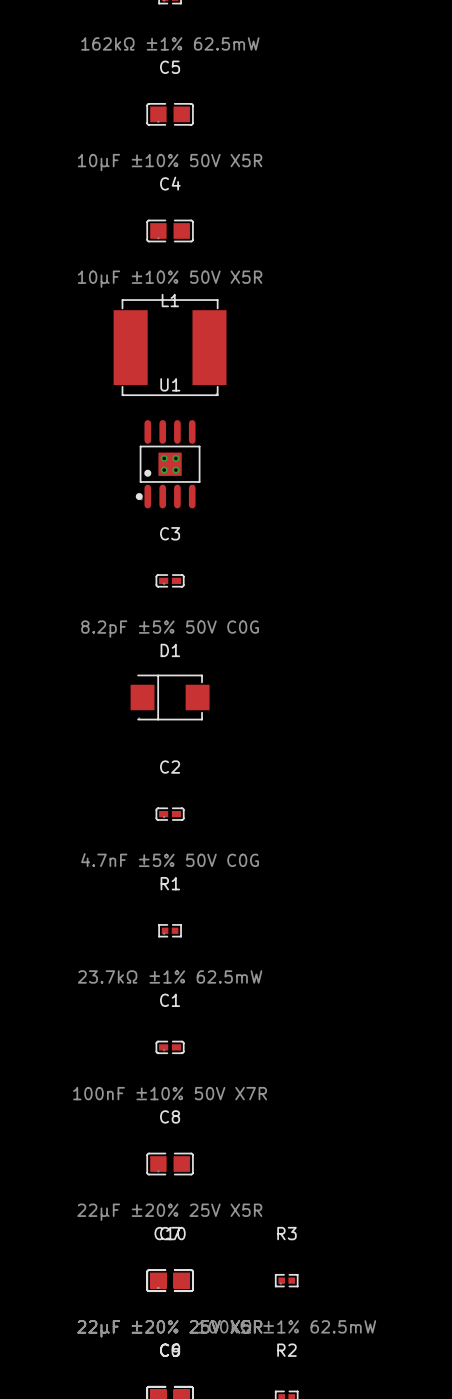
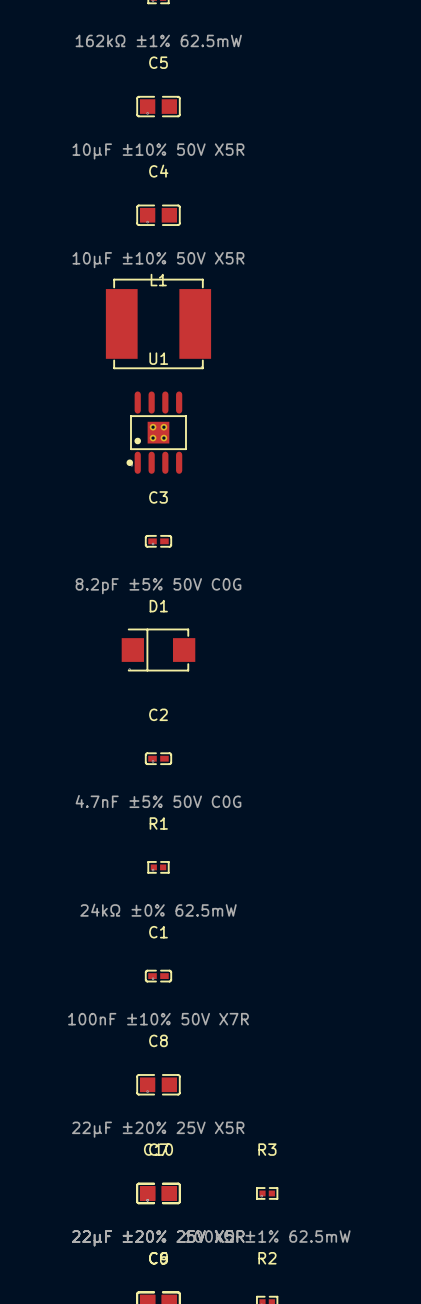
R1 value: 23.7kΩ ±1% 62.5mW (170, 976) -> 24kΩ ±0% 62.5mW (158, 910)

